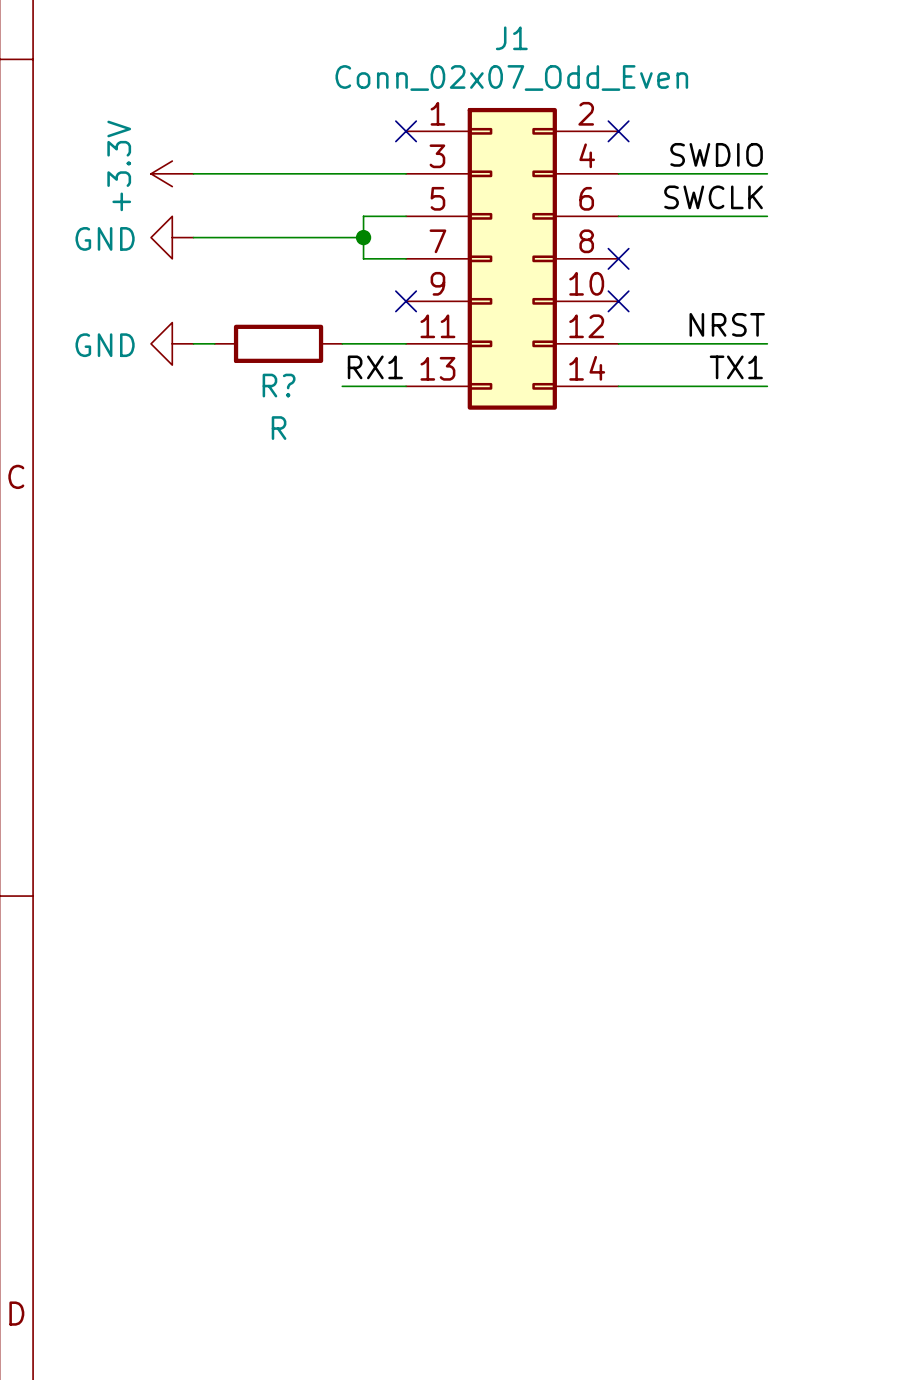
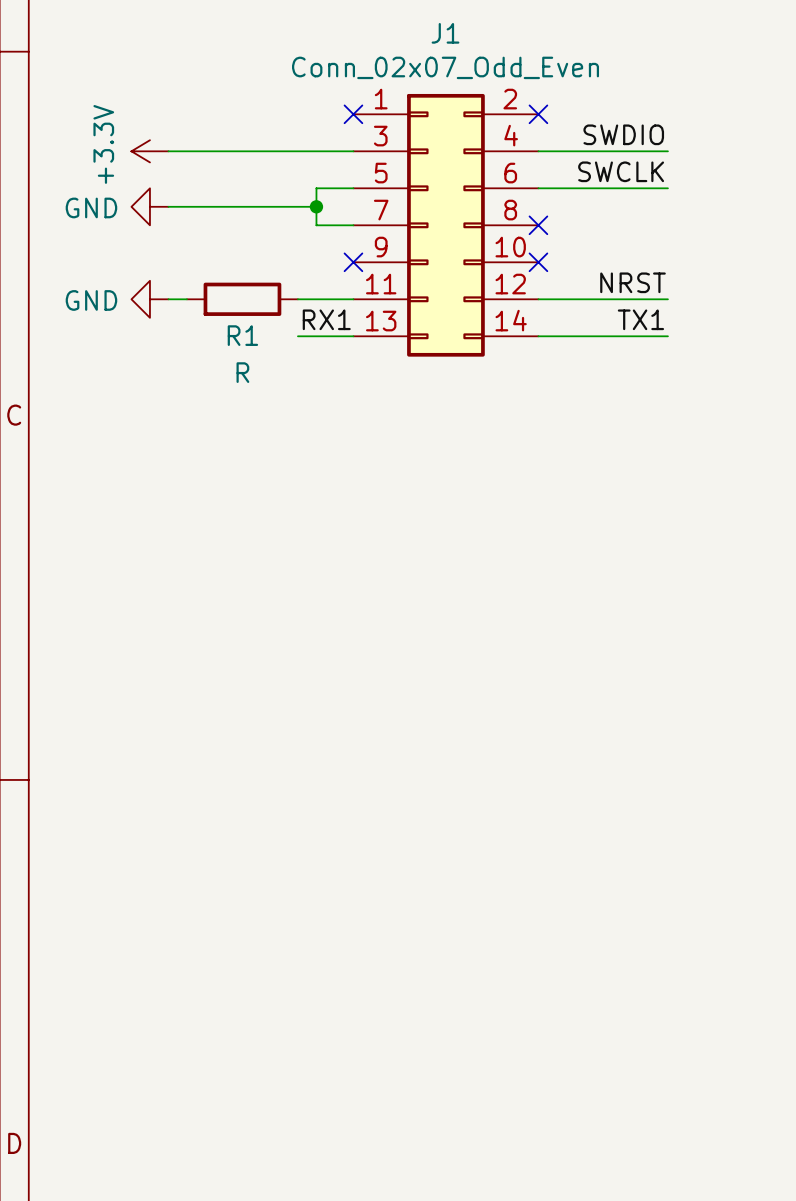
R? name: R? (279, 385) -> R1 (242, 335)

